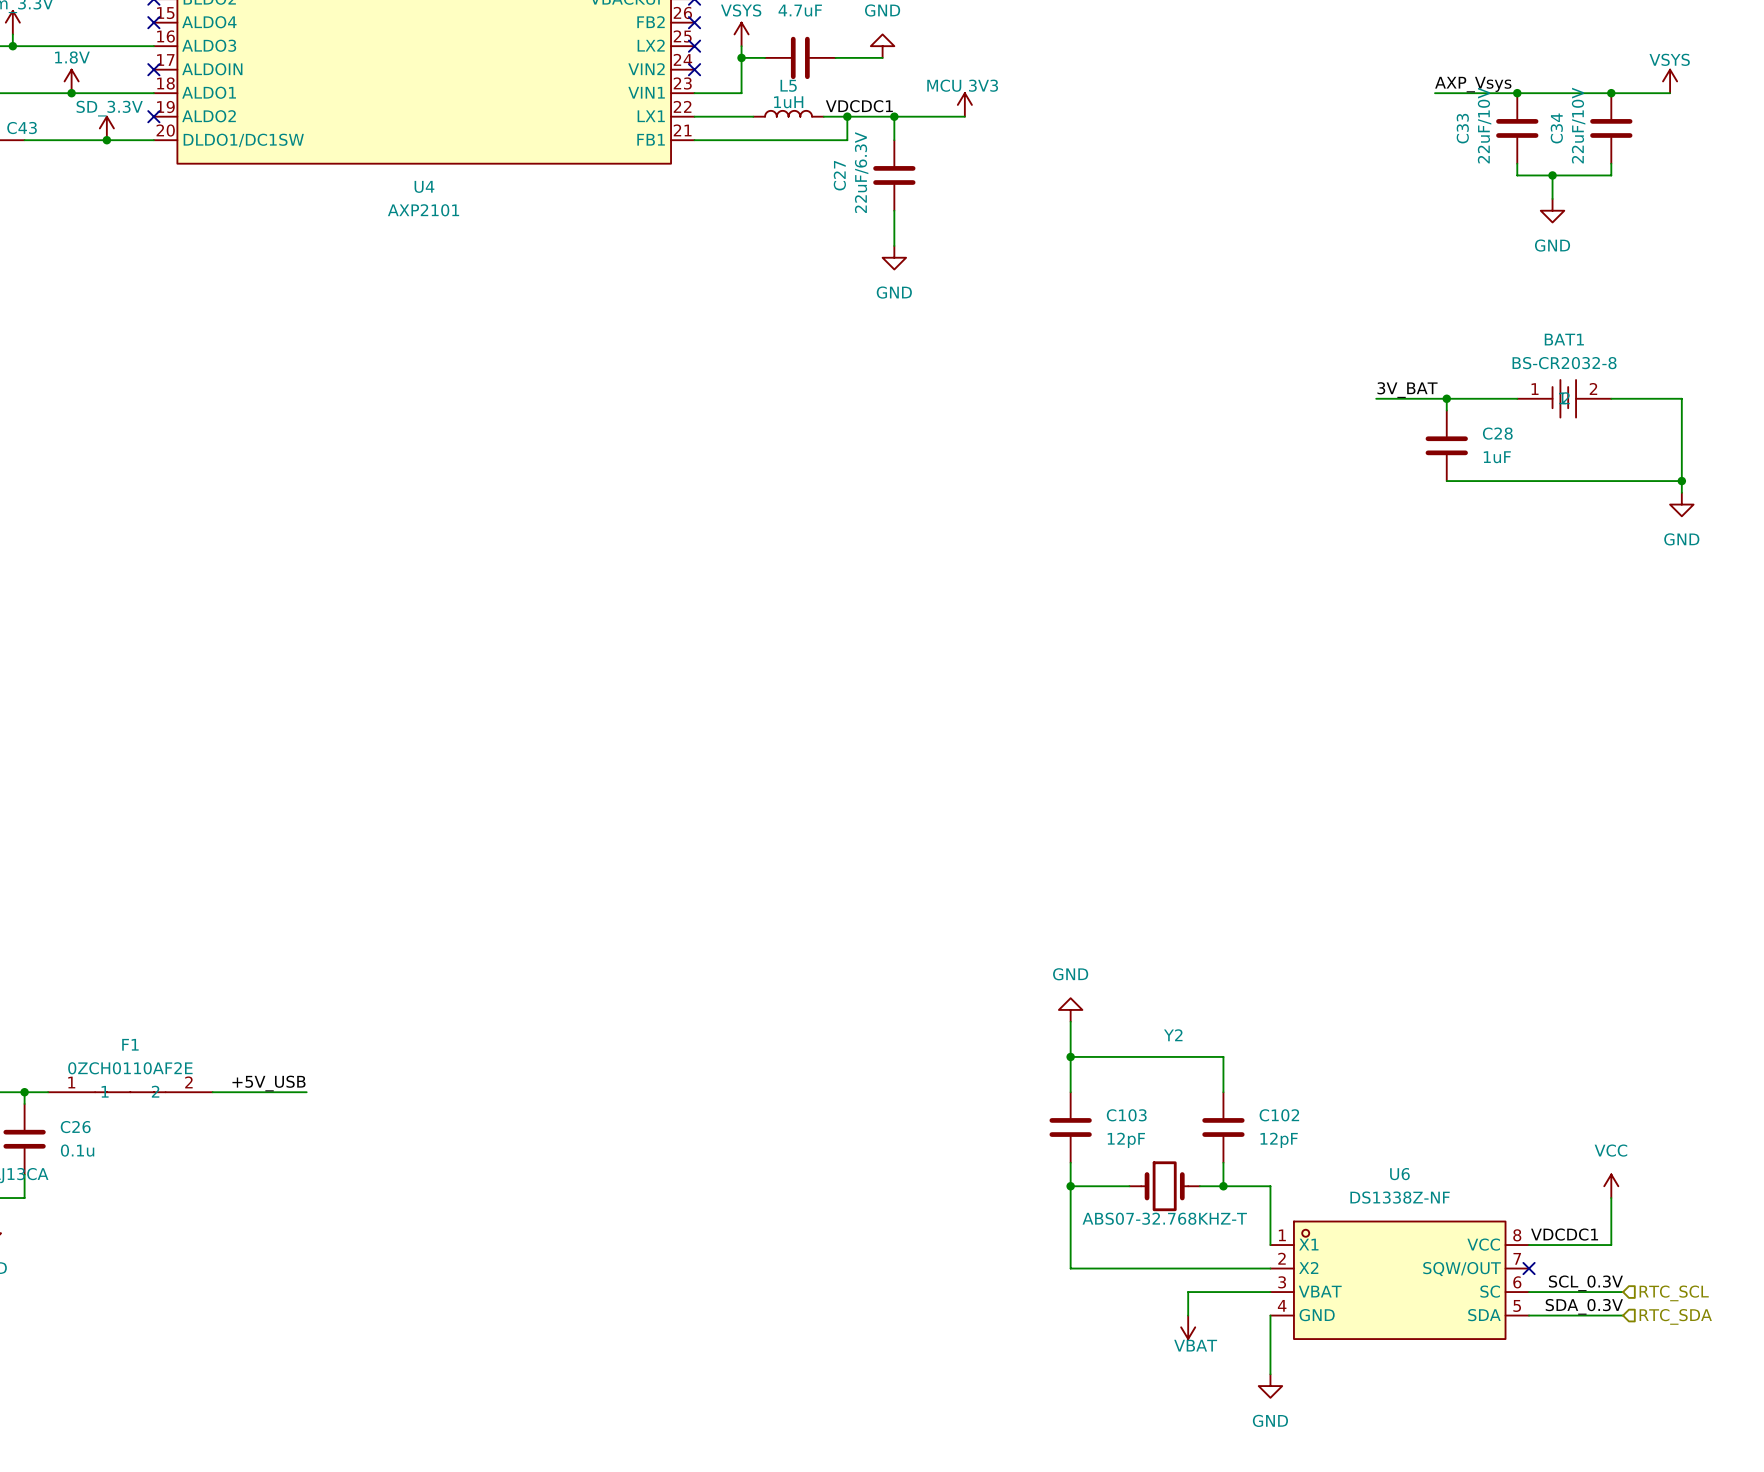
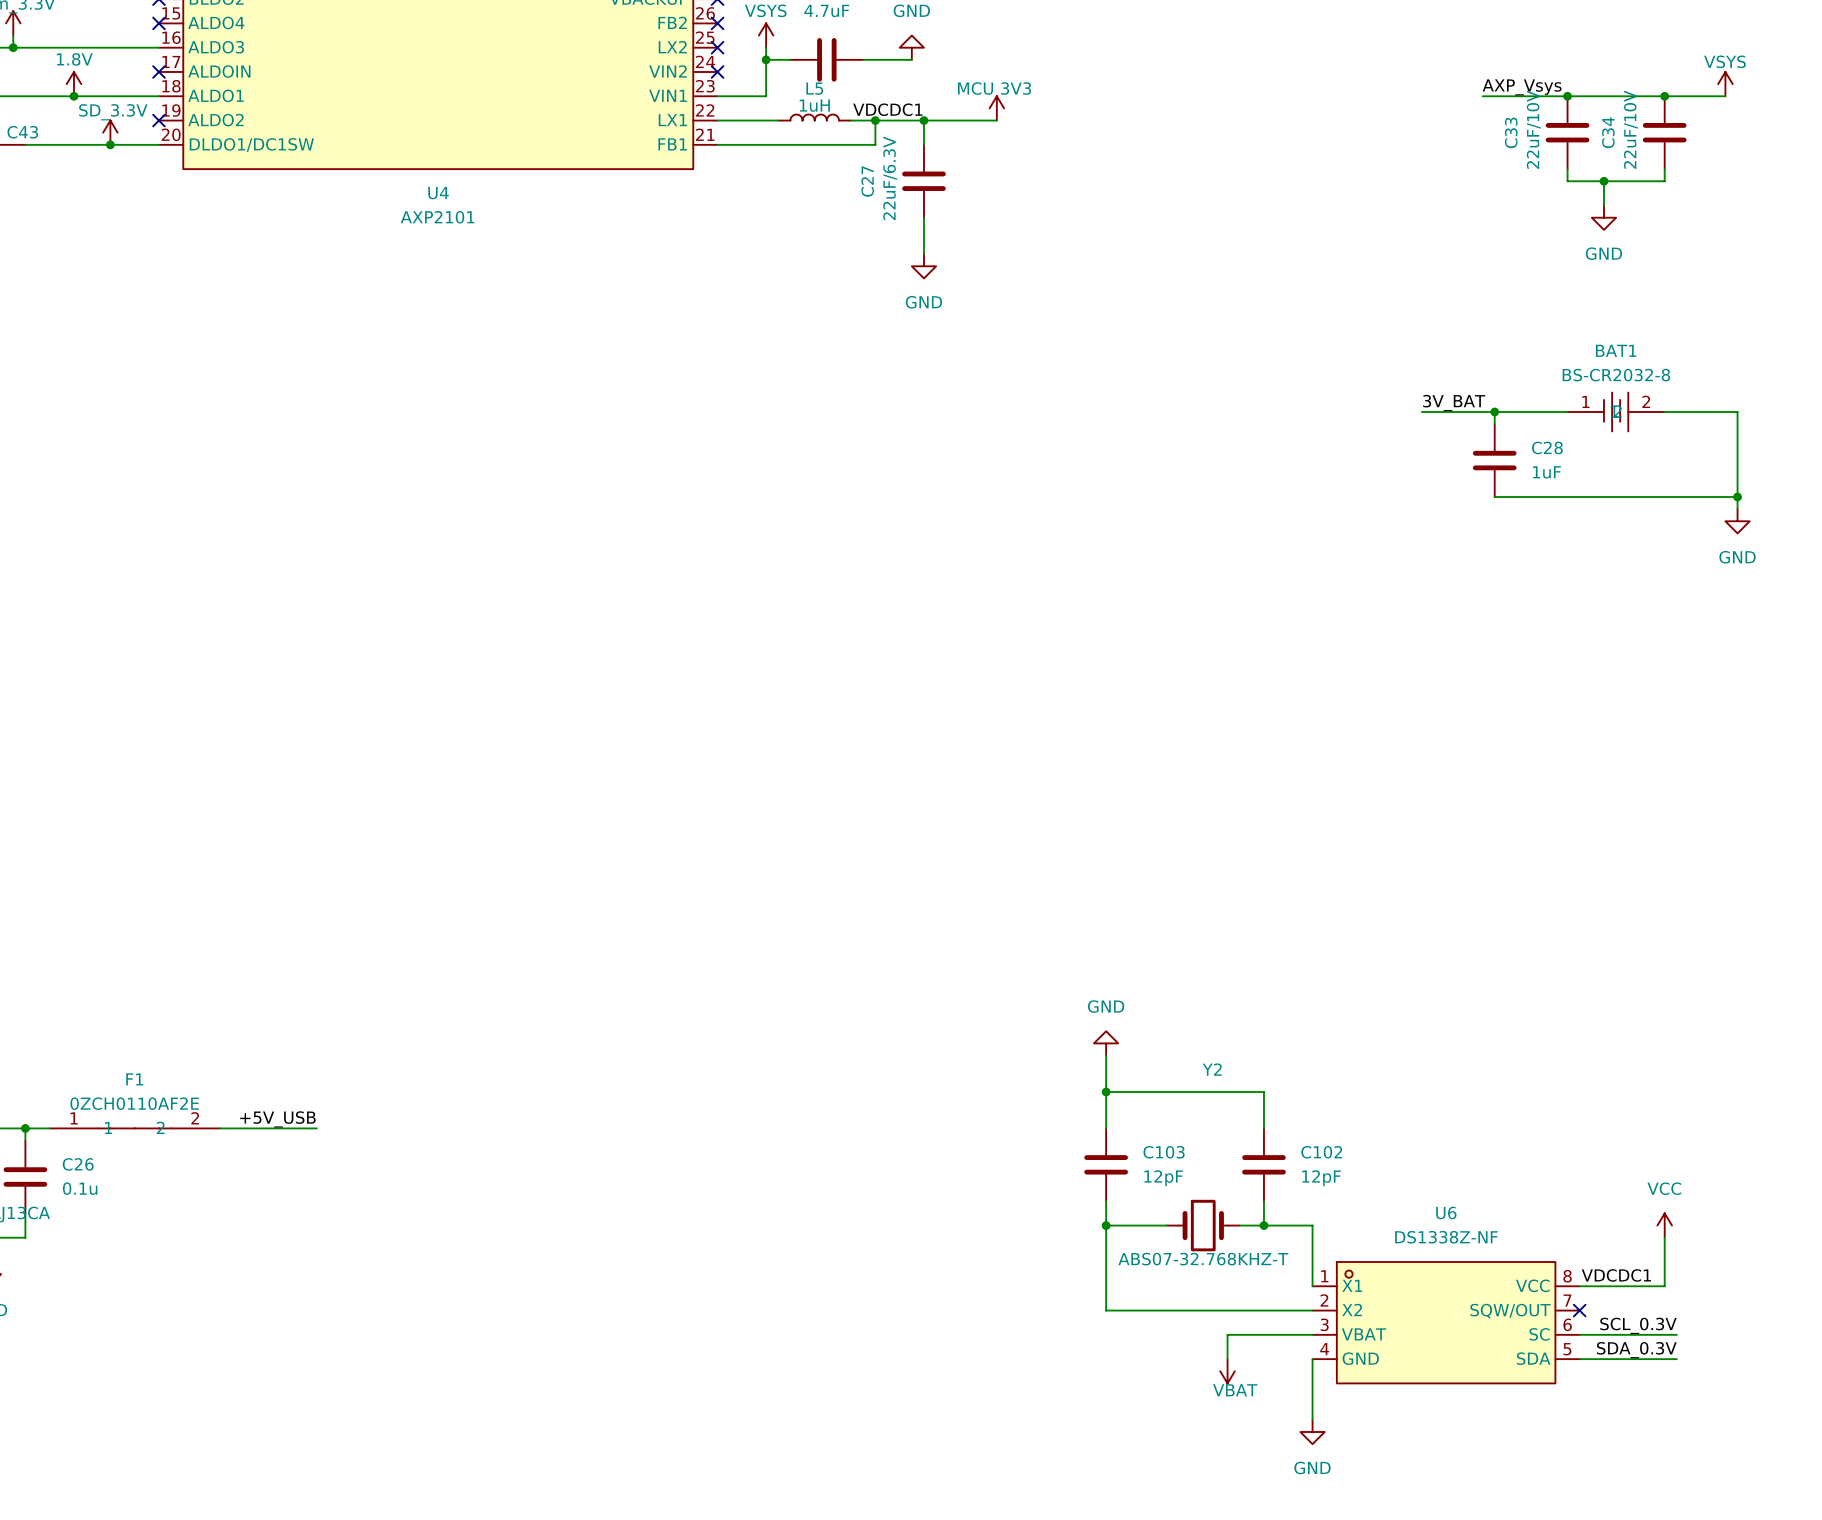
hierarchical label: RTC_SCL (1674, 1293) -> none
hierarchical label: RTC_SDA (1675, 1316) -> none

